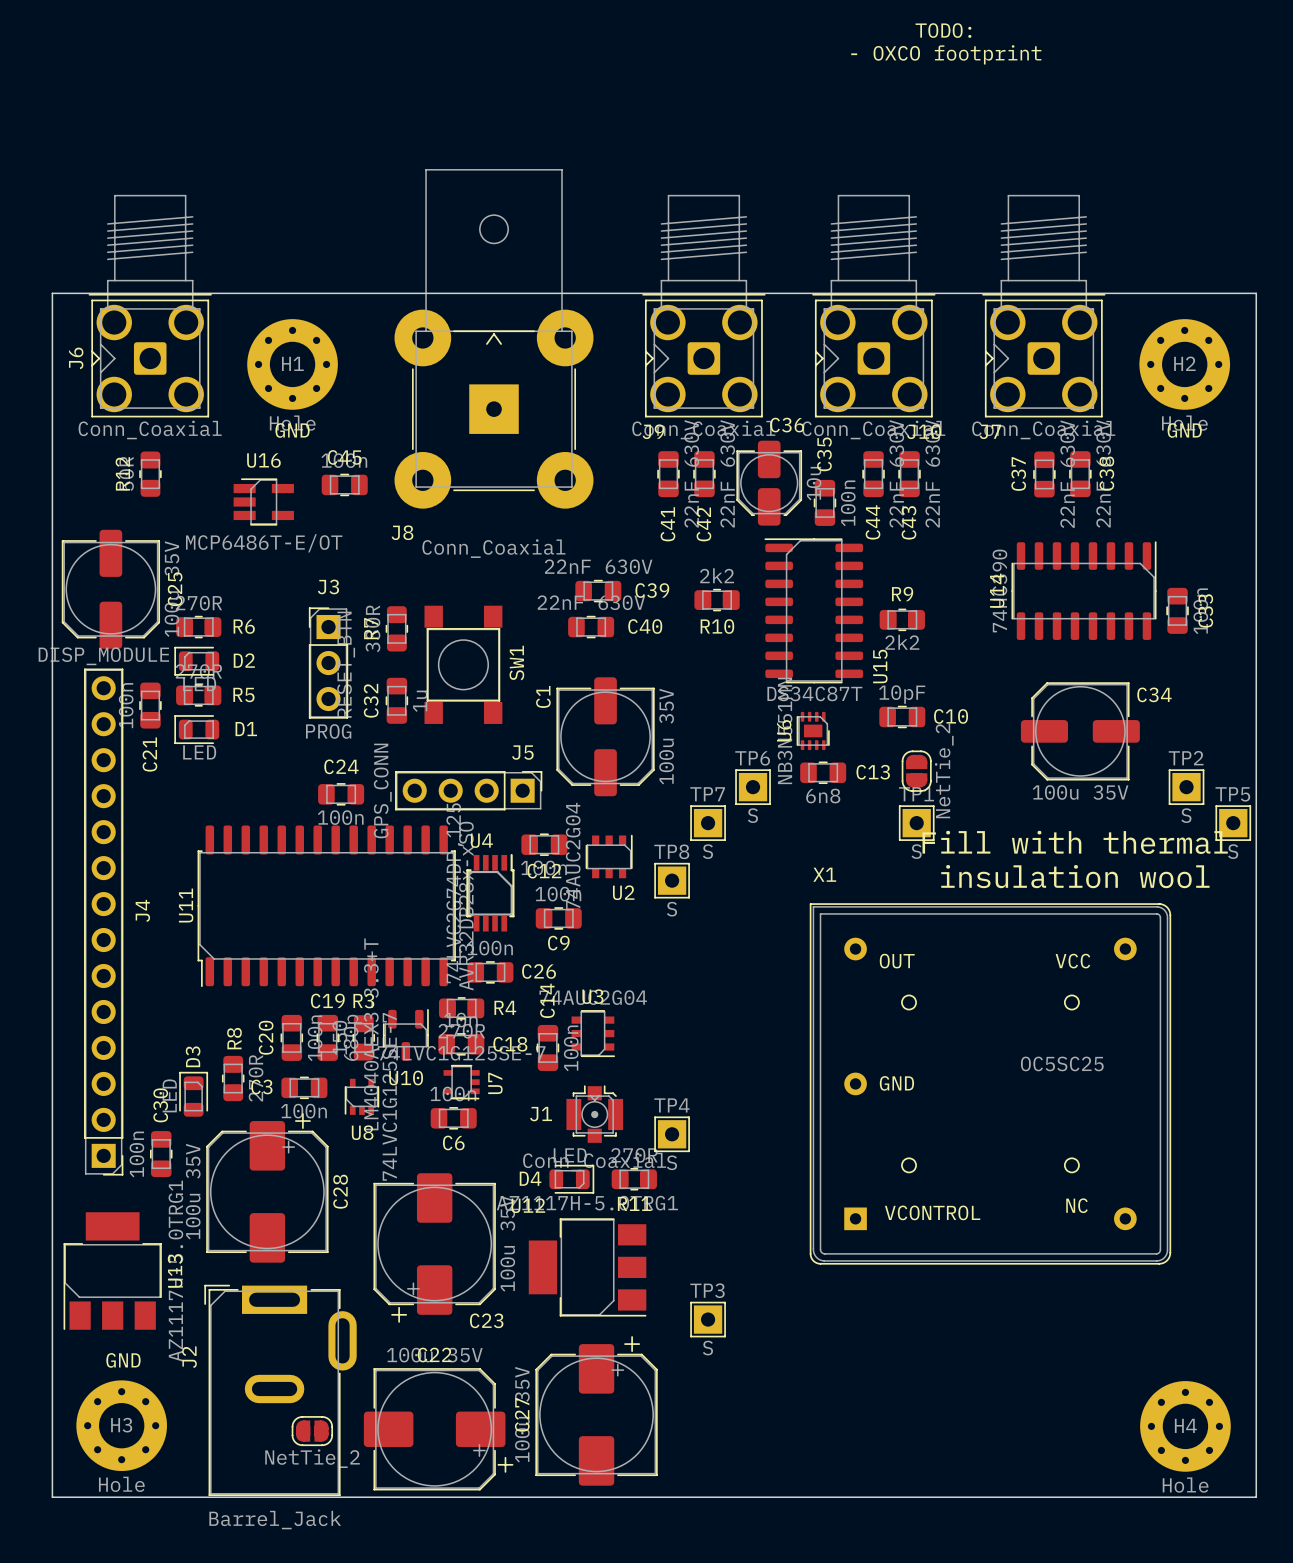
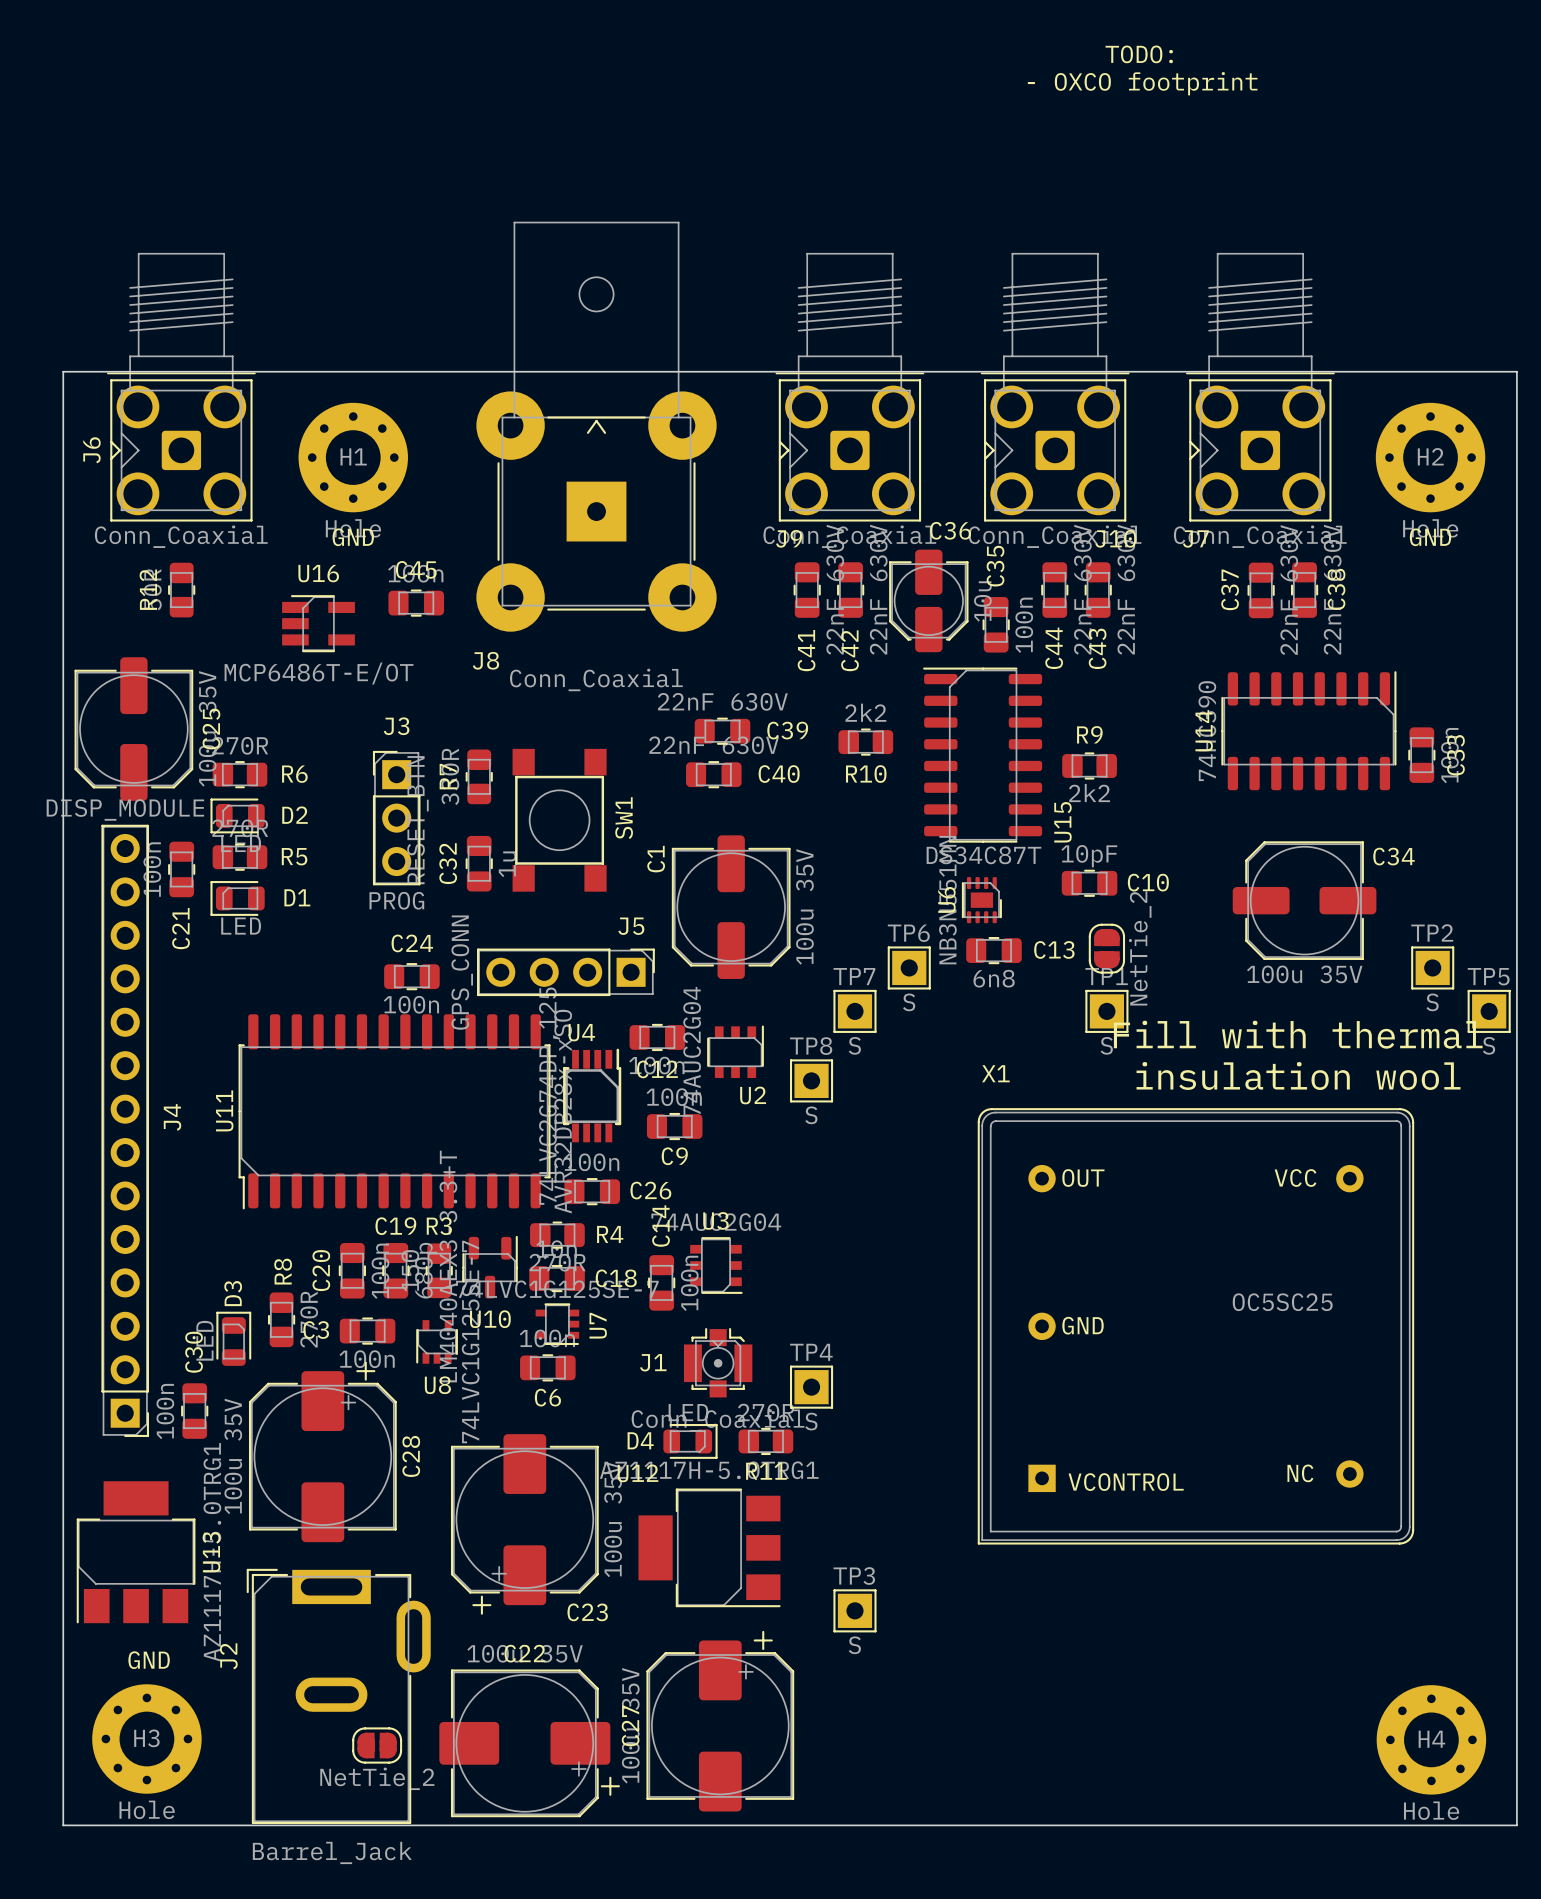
X1 footprint: [809, 903, 1172, 1265] -> [977, 1108, 1415, 1545]

